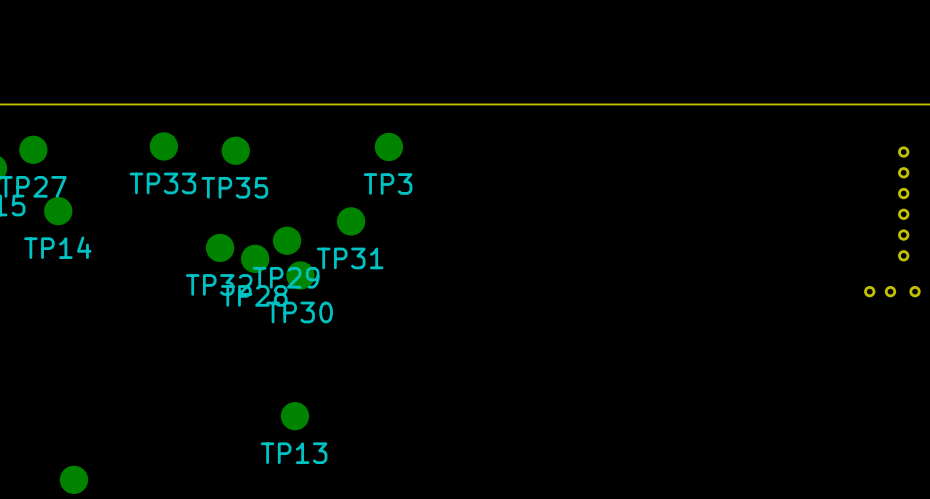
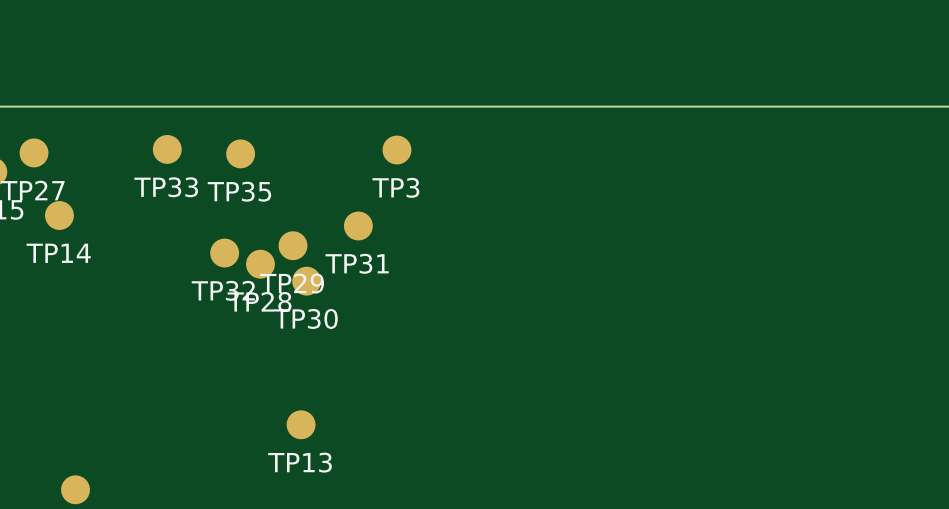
part: (903, 152) -> none
part: (903, 172) -> none
part: (903, 193) -> none
part: (903, 214) -> none
part: (903, 235) -> none
part: (903, 255) -> none
part: (869, 291) -> none
part: (890, 291) -> none
part: (915, 291) -> none

